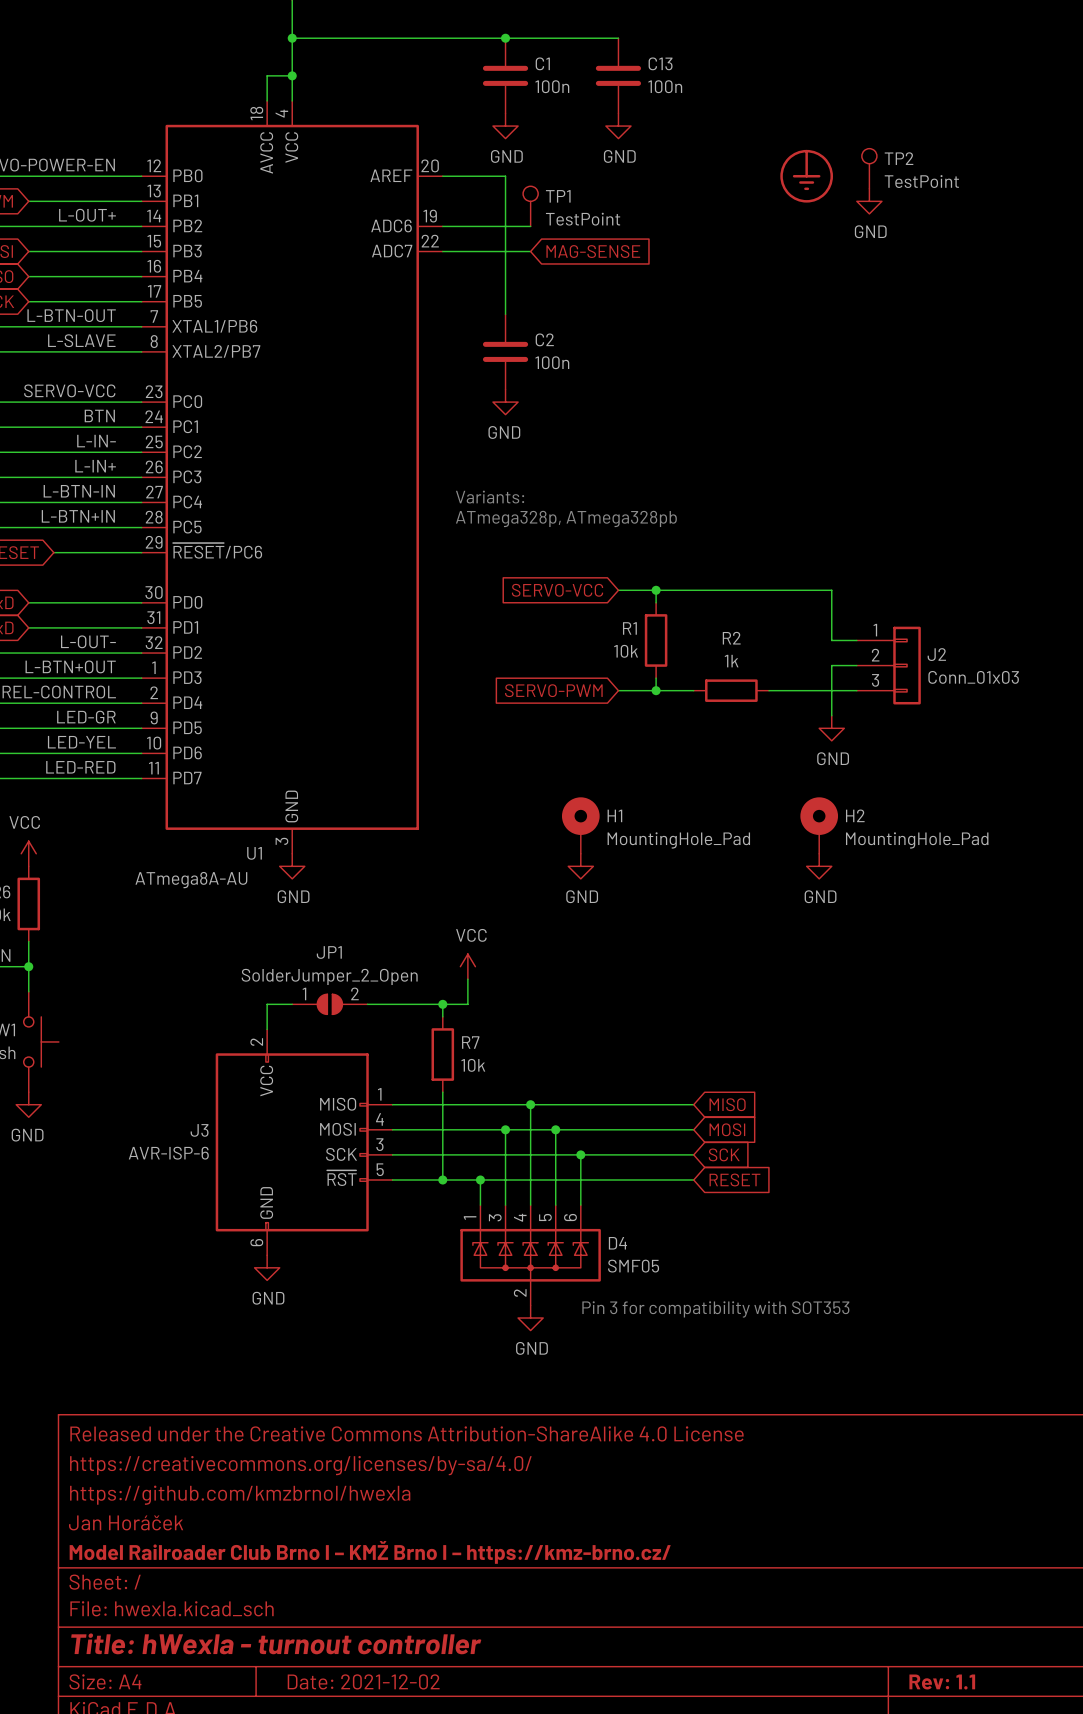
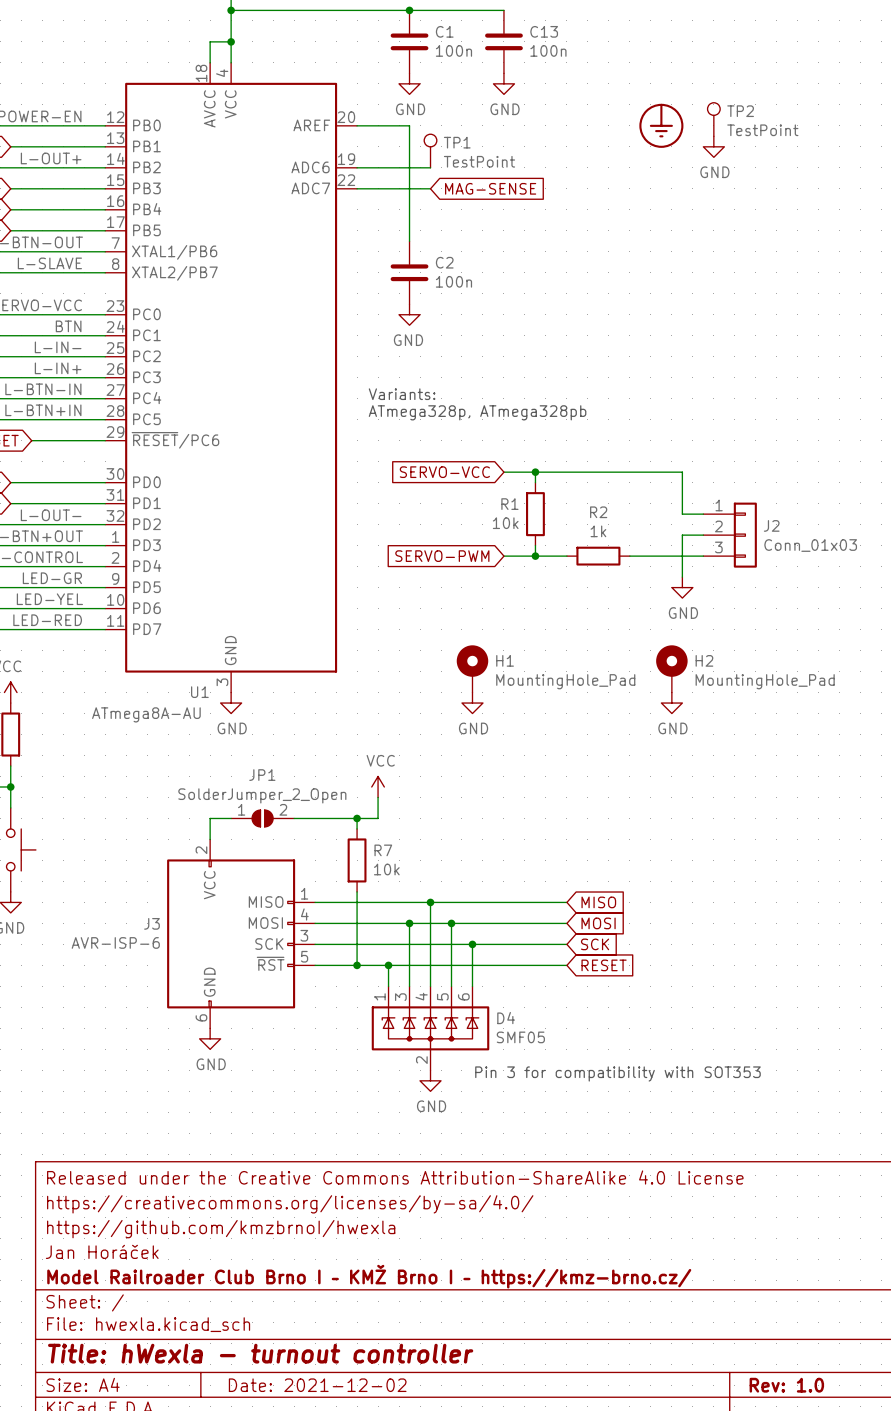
title block: Rev: 1.1 (942, 1681) -> Rev: 1.0 (786, 1385)

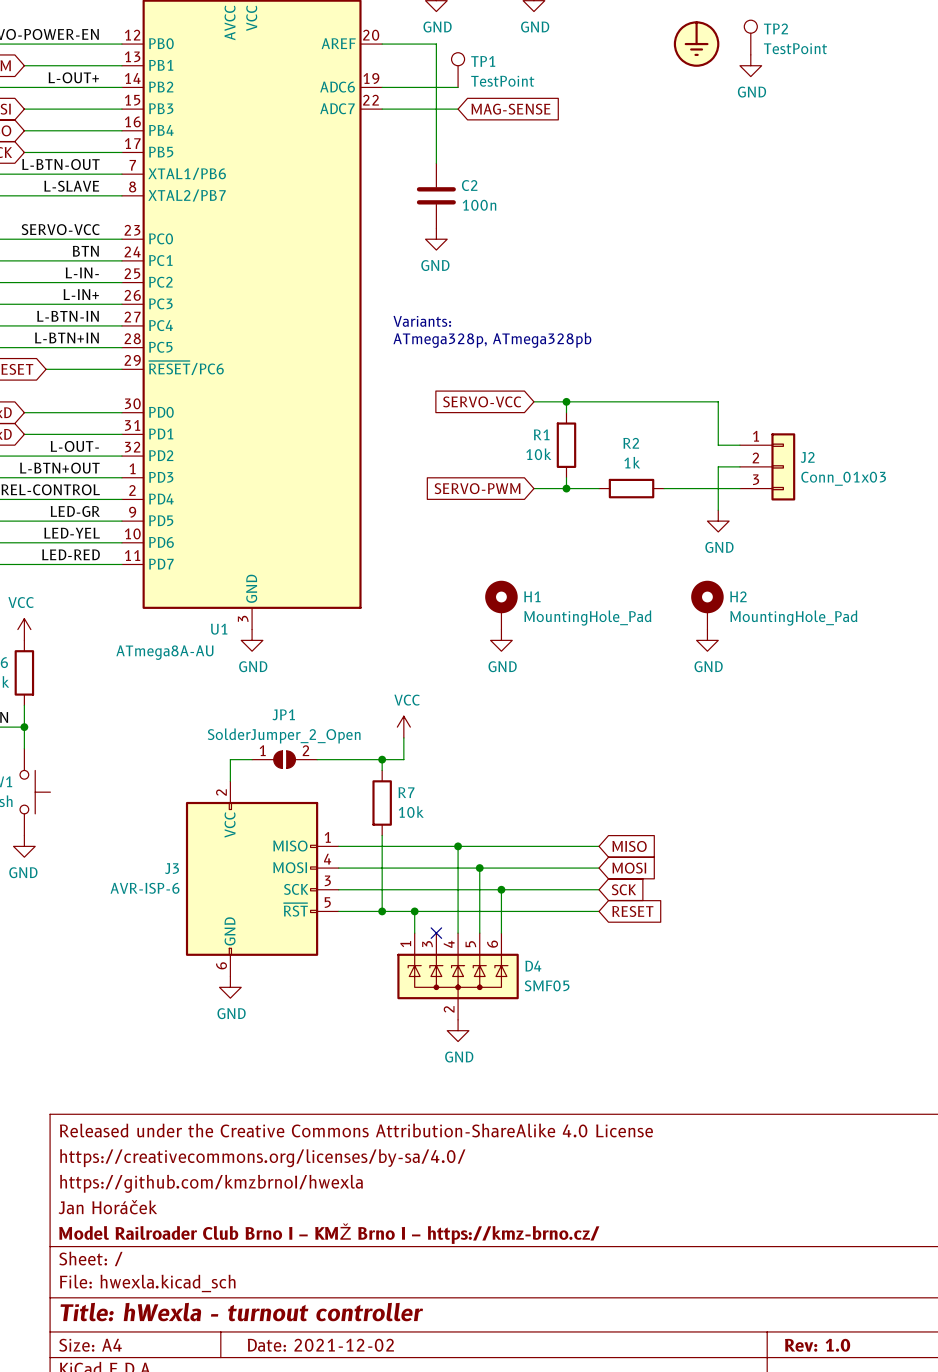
wire: (409, 923) (409, 986) -> none
junction: (409, 923) -> none
no-connect mark: none -> (436, 933)
text: Pin 3 for compatibility with SOT353 (617, 1073) -> none

